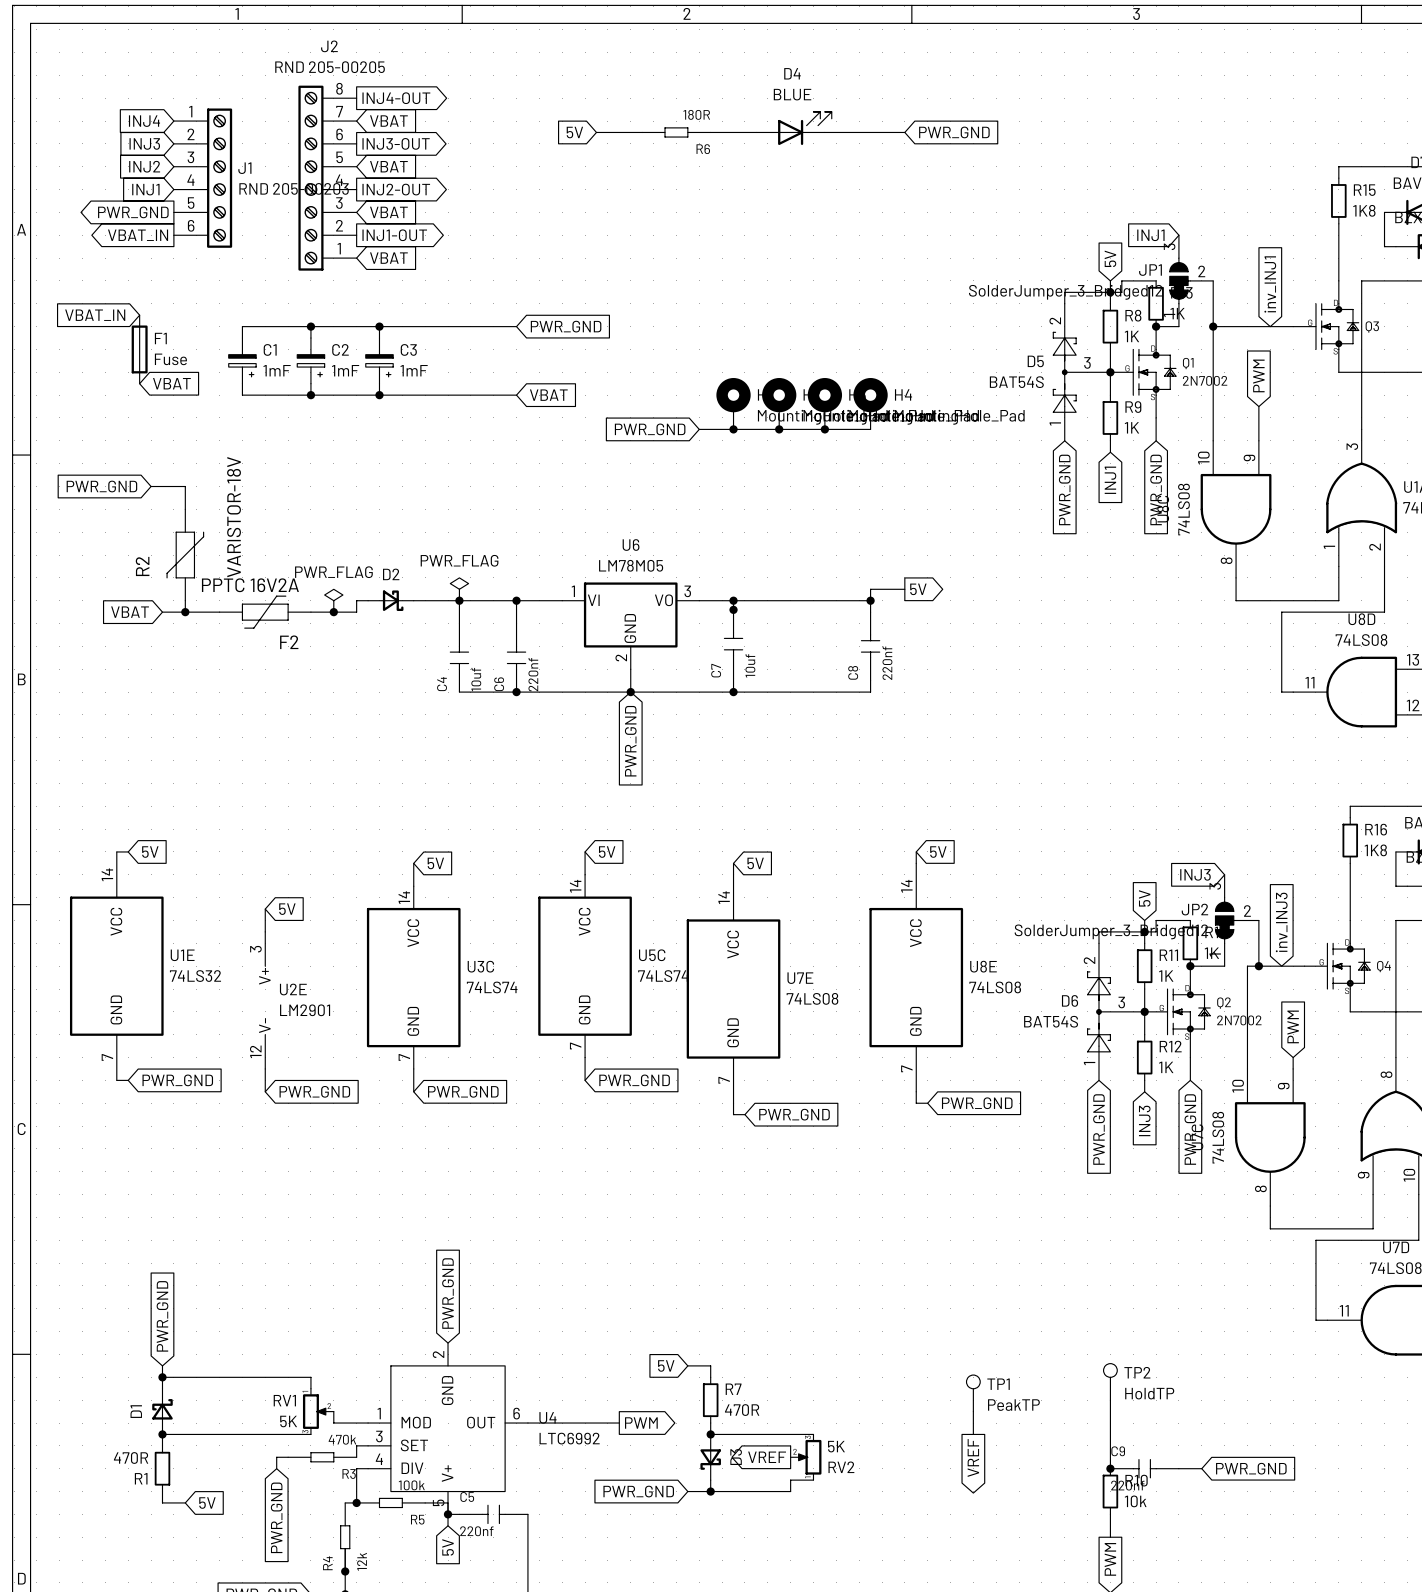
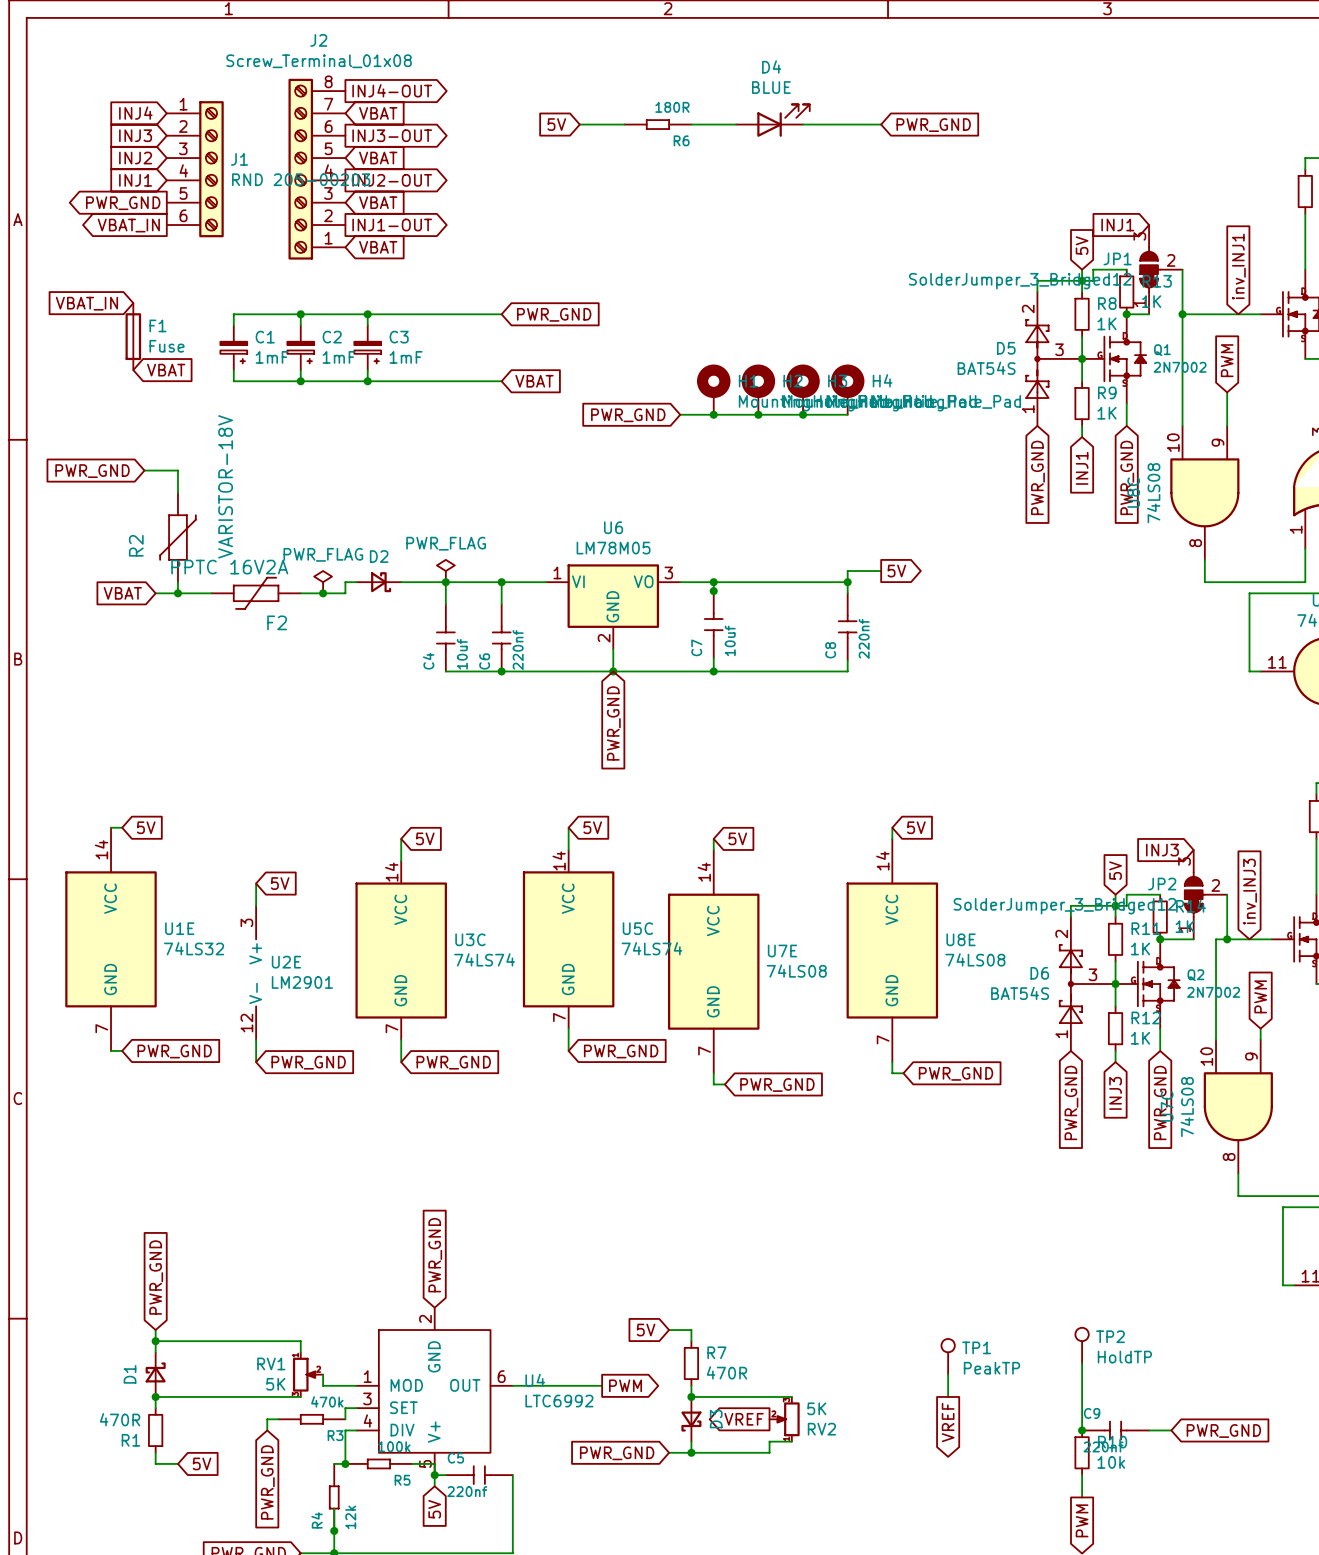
J2 value: RND 205-00205 (330, 67) -> Screw_Terminal_01x08 (319, 61)

